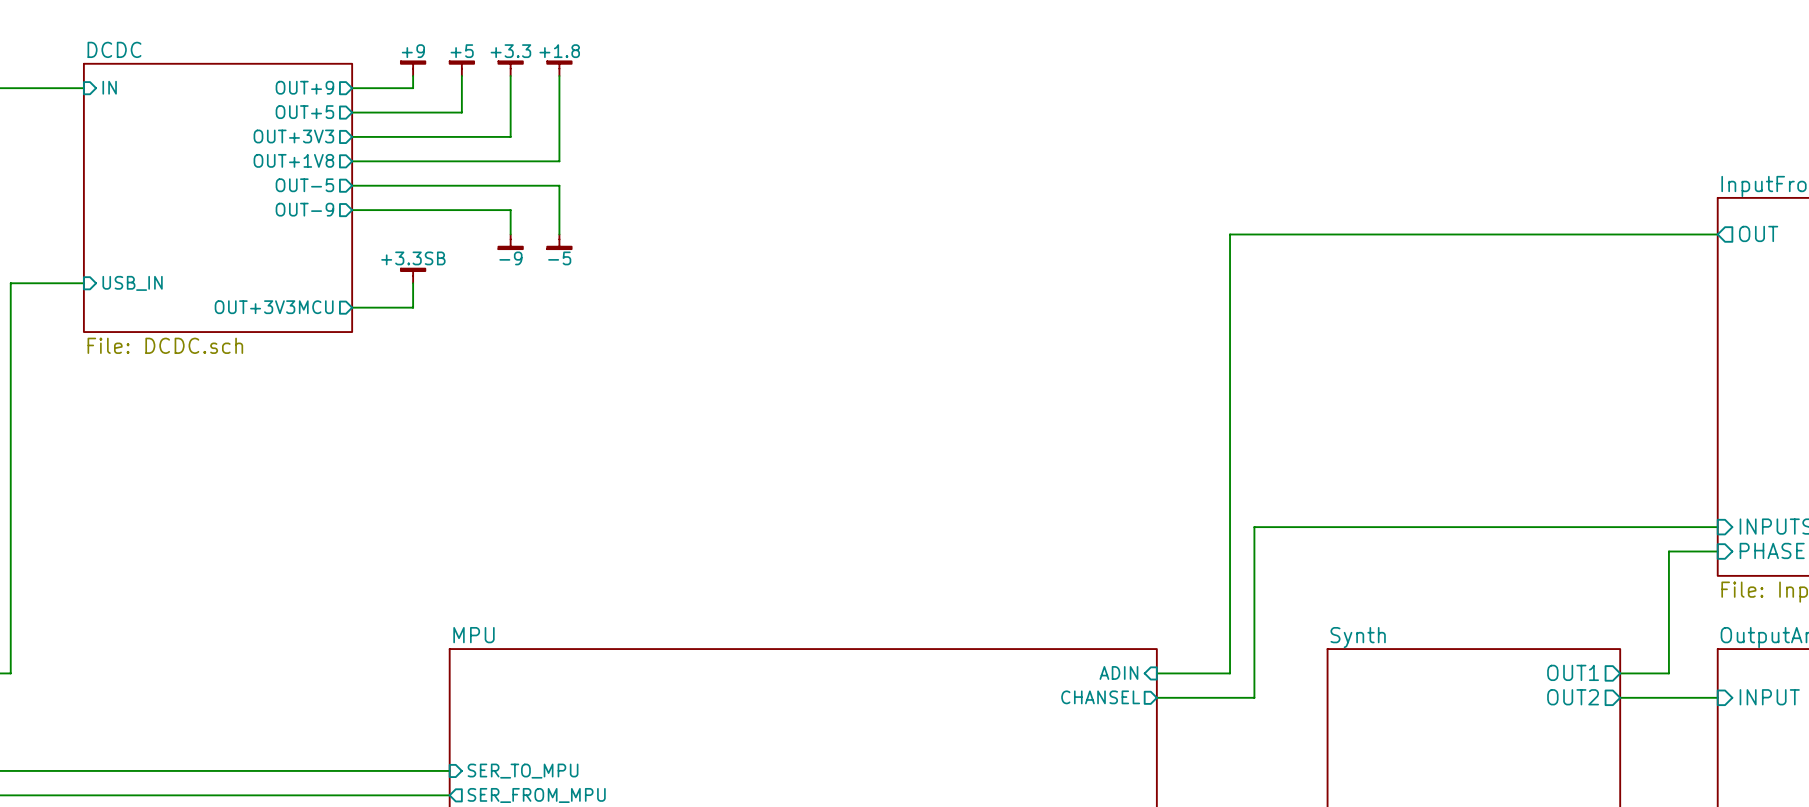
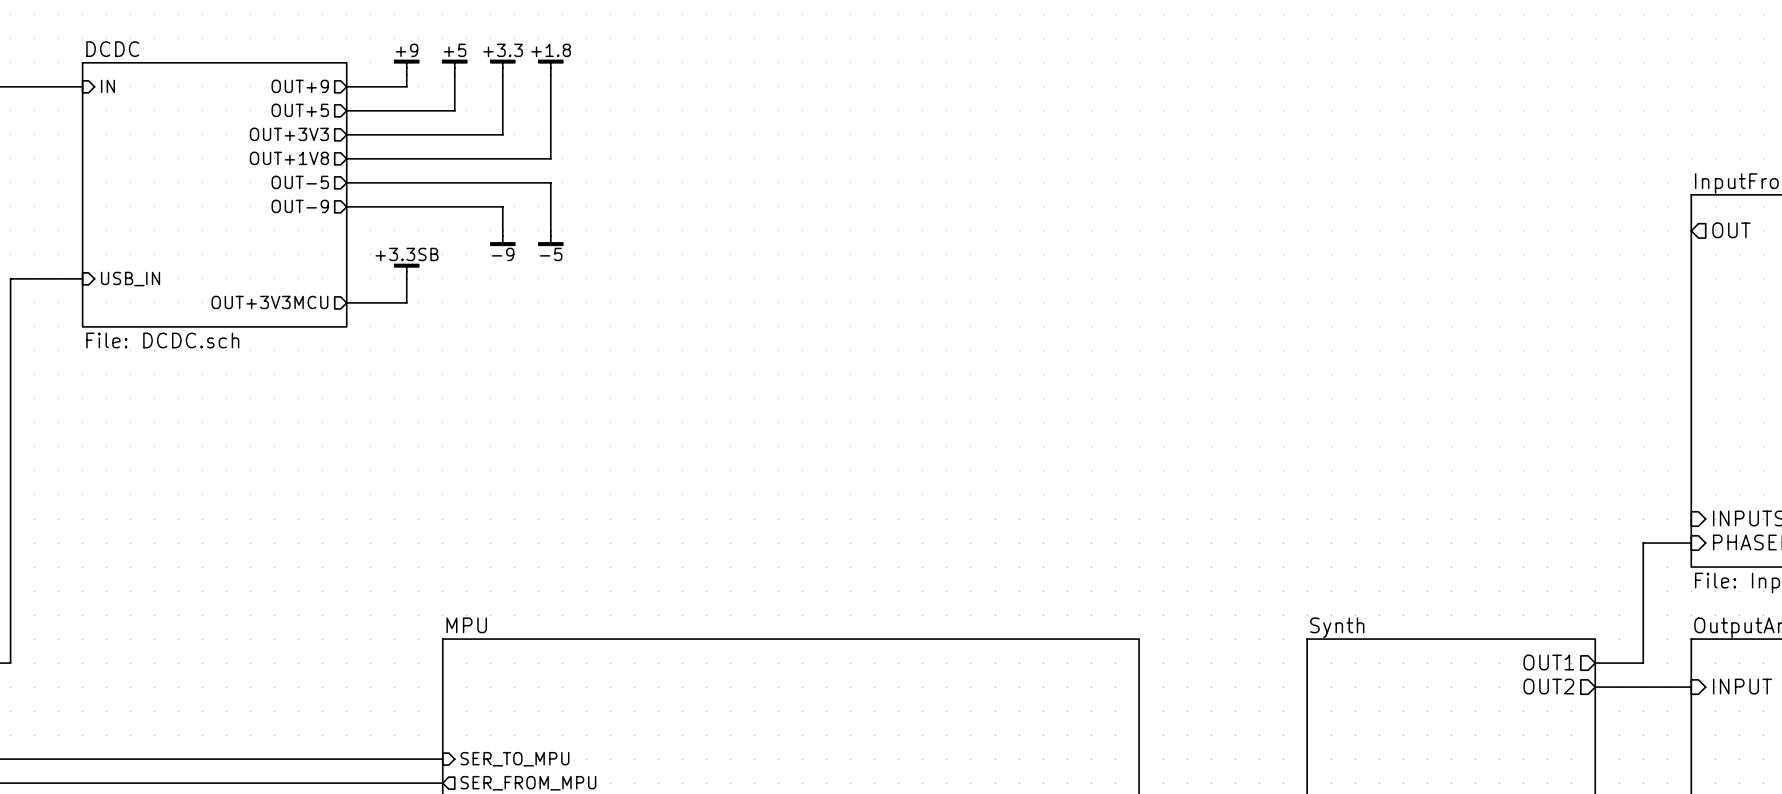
wire: (1717, 234) (1230, 234) (1230, 673) (1156, 673) -> none
wire: (1717, 527) (1254, 527) (1254, 697) (1156, 697) -> none
sheet pin: ADIN (1118, 672) -> none
sheet pin: CHANSEL (1100, 697) -> none

